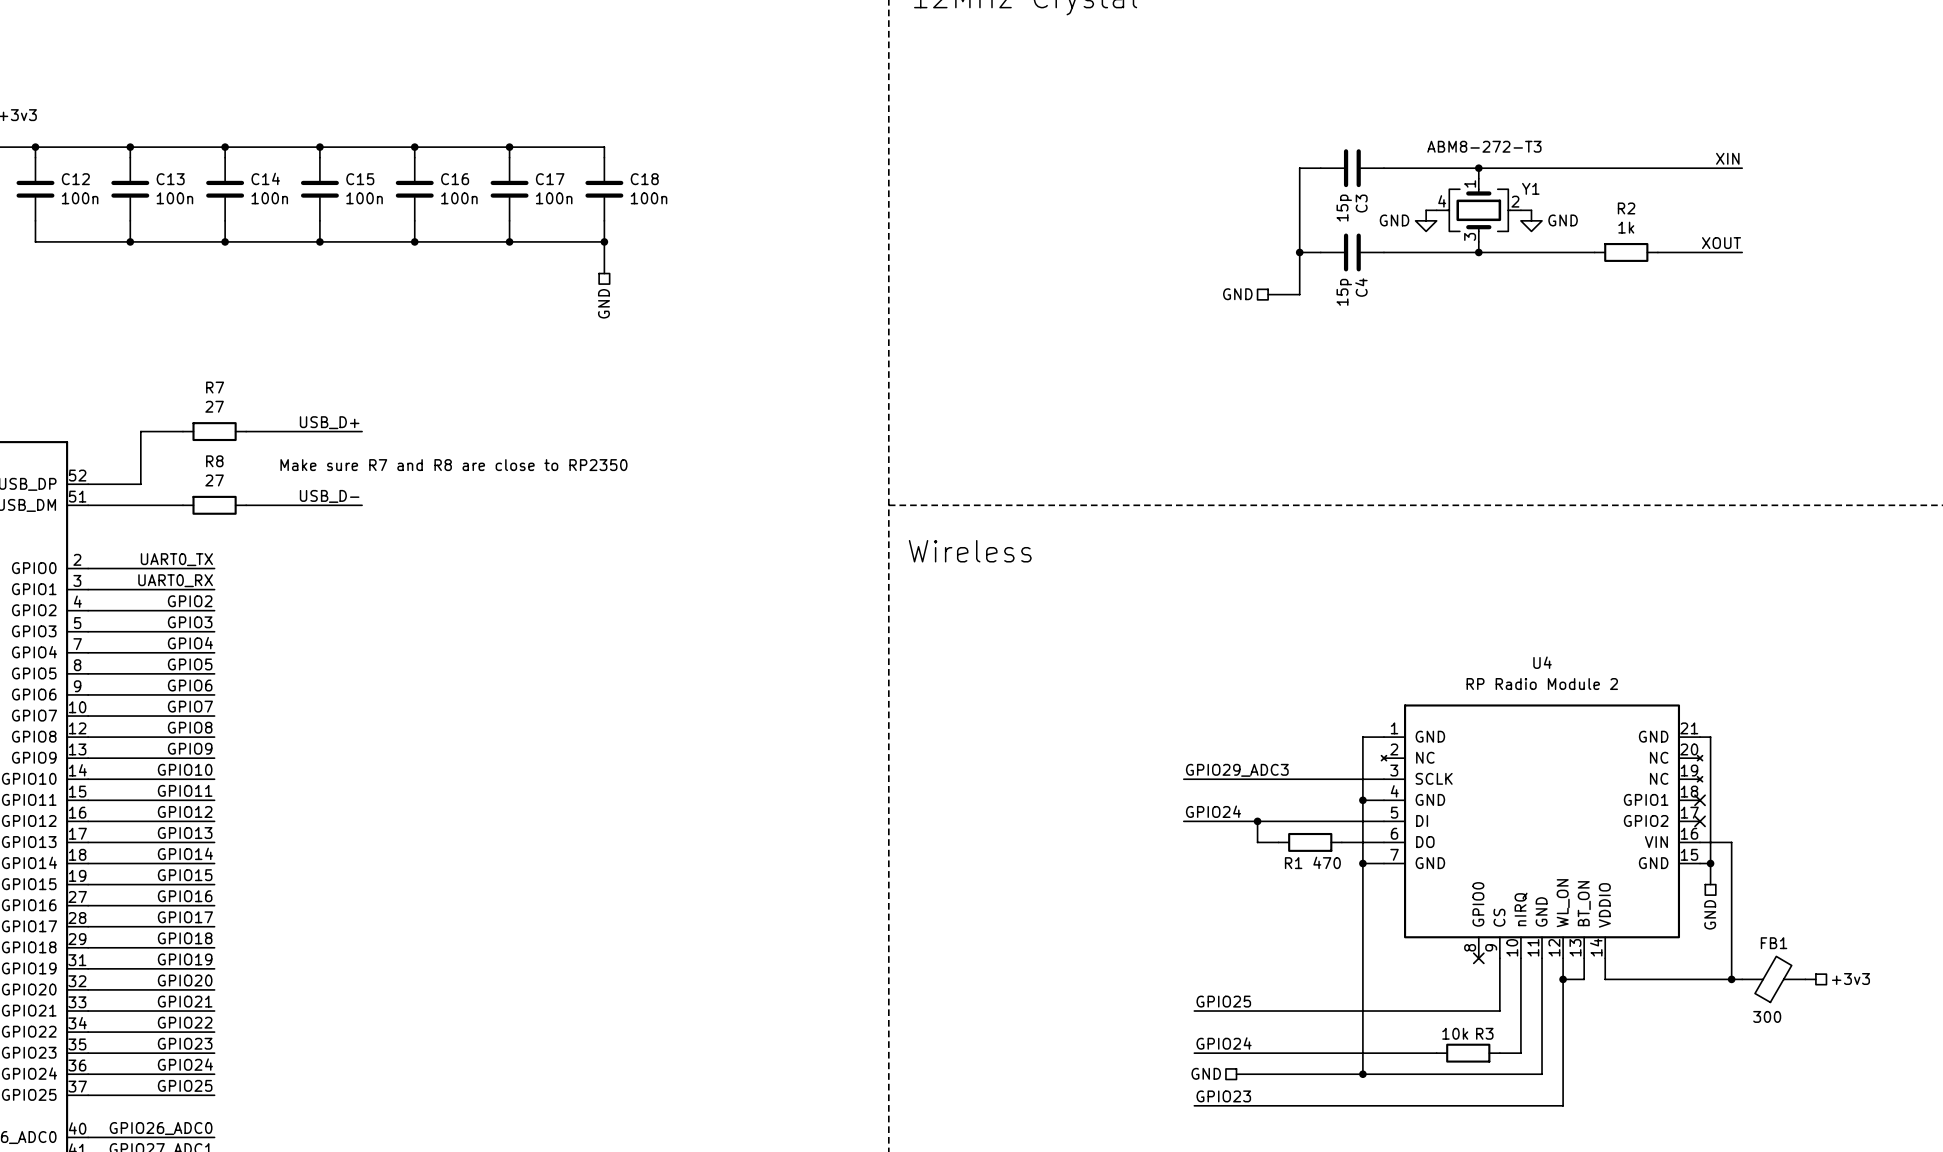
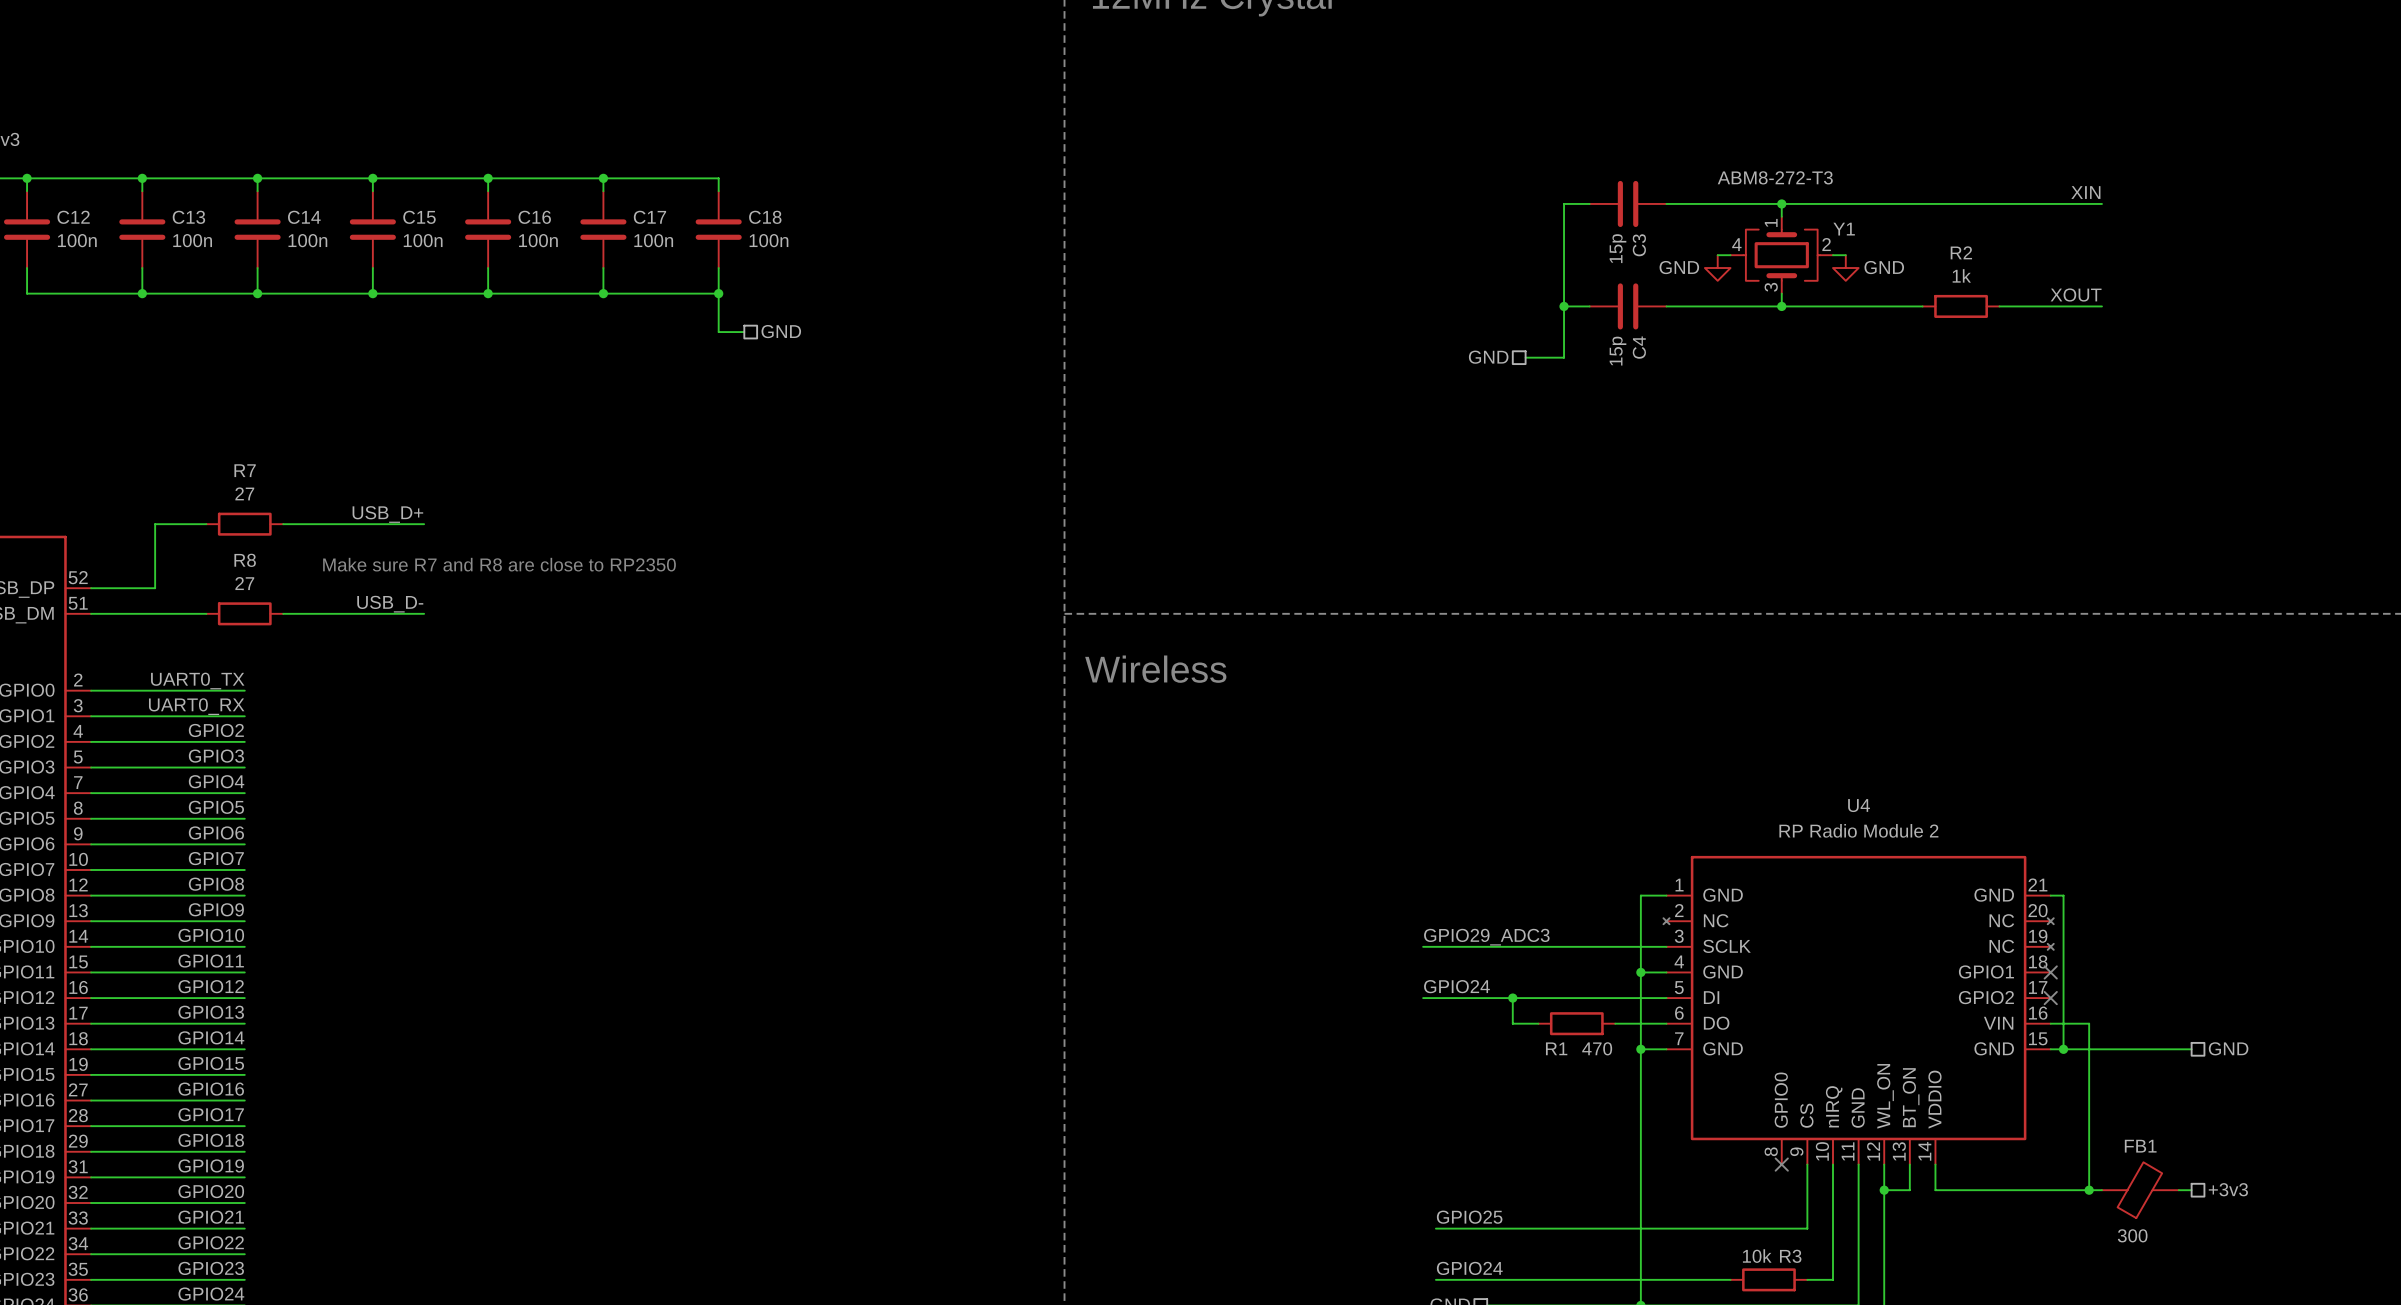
wire: none -> (718, 332) (744, 332)
hierarchical label rotation: 0° (603, 303) -> 90° counterclockwise (781, 331)
hierarchical label position: GND (603, 303) -> GND (781, 331)
wire: (1710, 863) (1710, 884) -> (2063, 1049) (2191, 1049)
hierarchical label rotation: 0° (1710, 914) -> 90° counterclockwise (2228, 1048)
hierarchical label position: GND (1710, 914) -> GND (2228, 1048)

